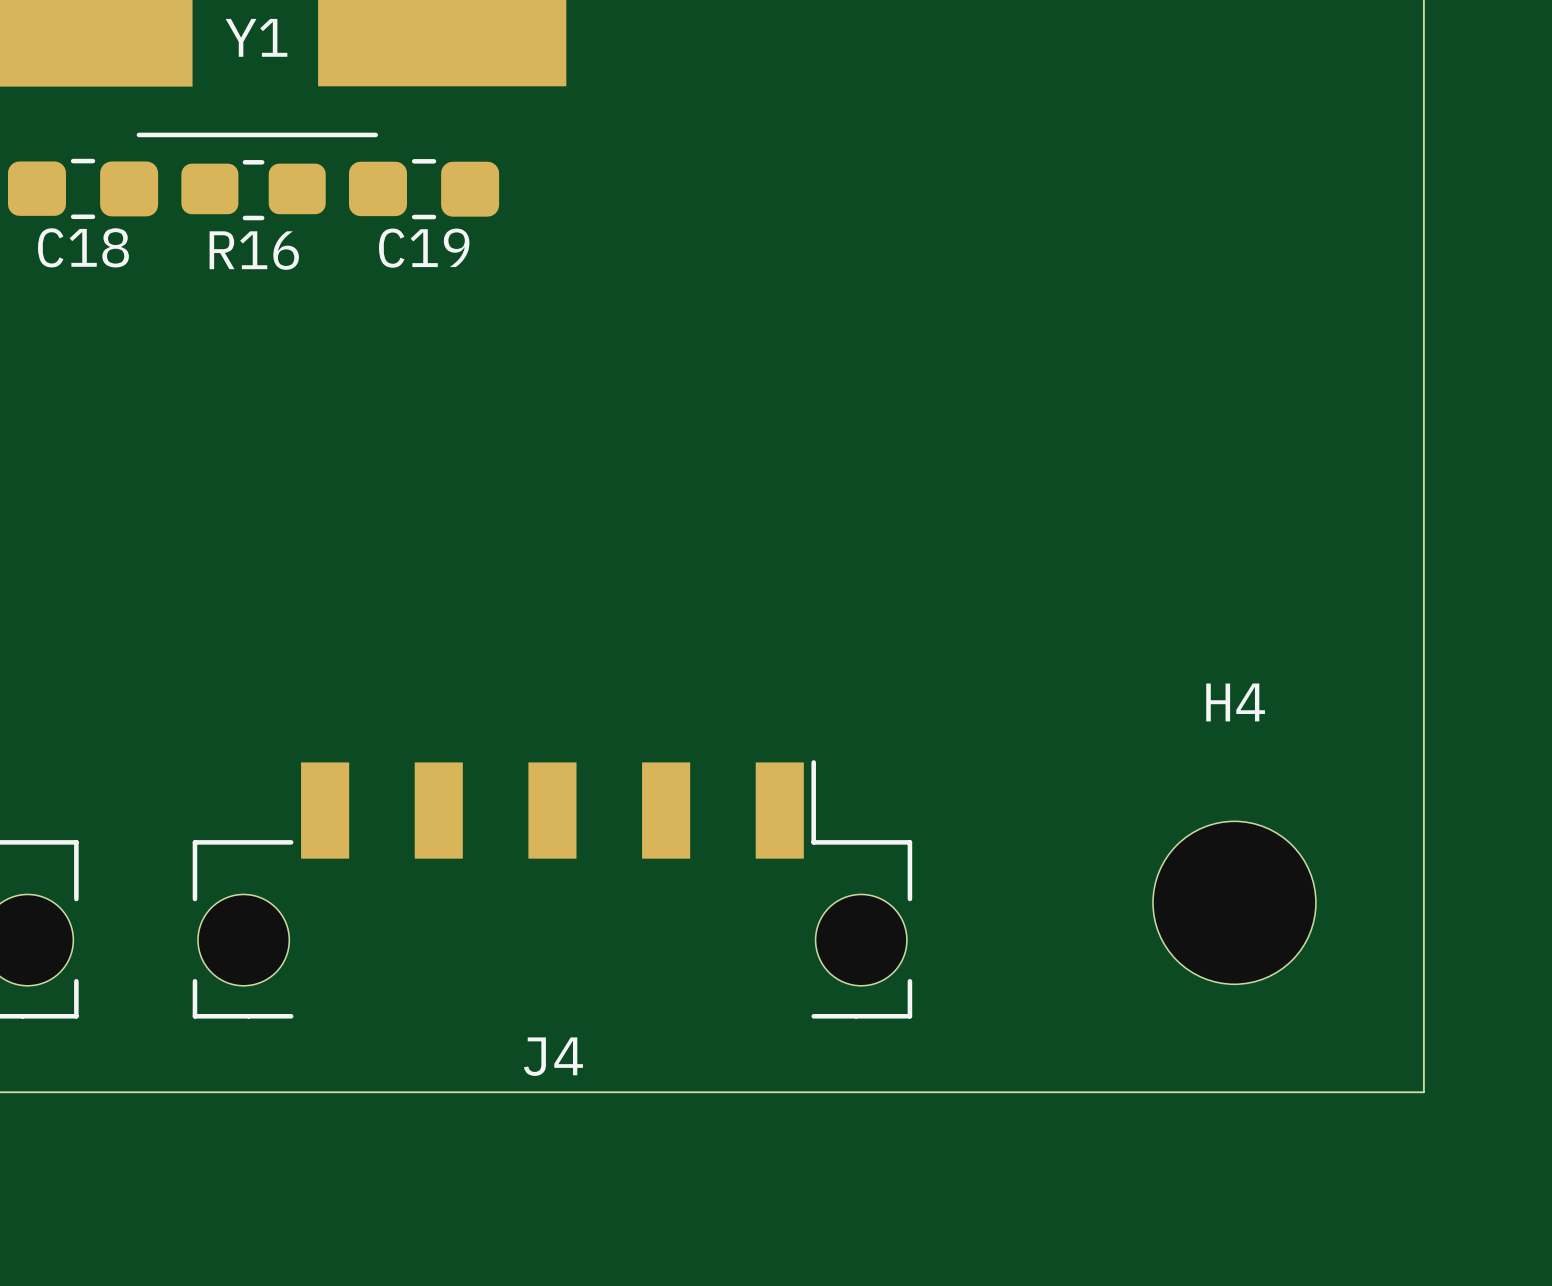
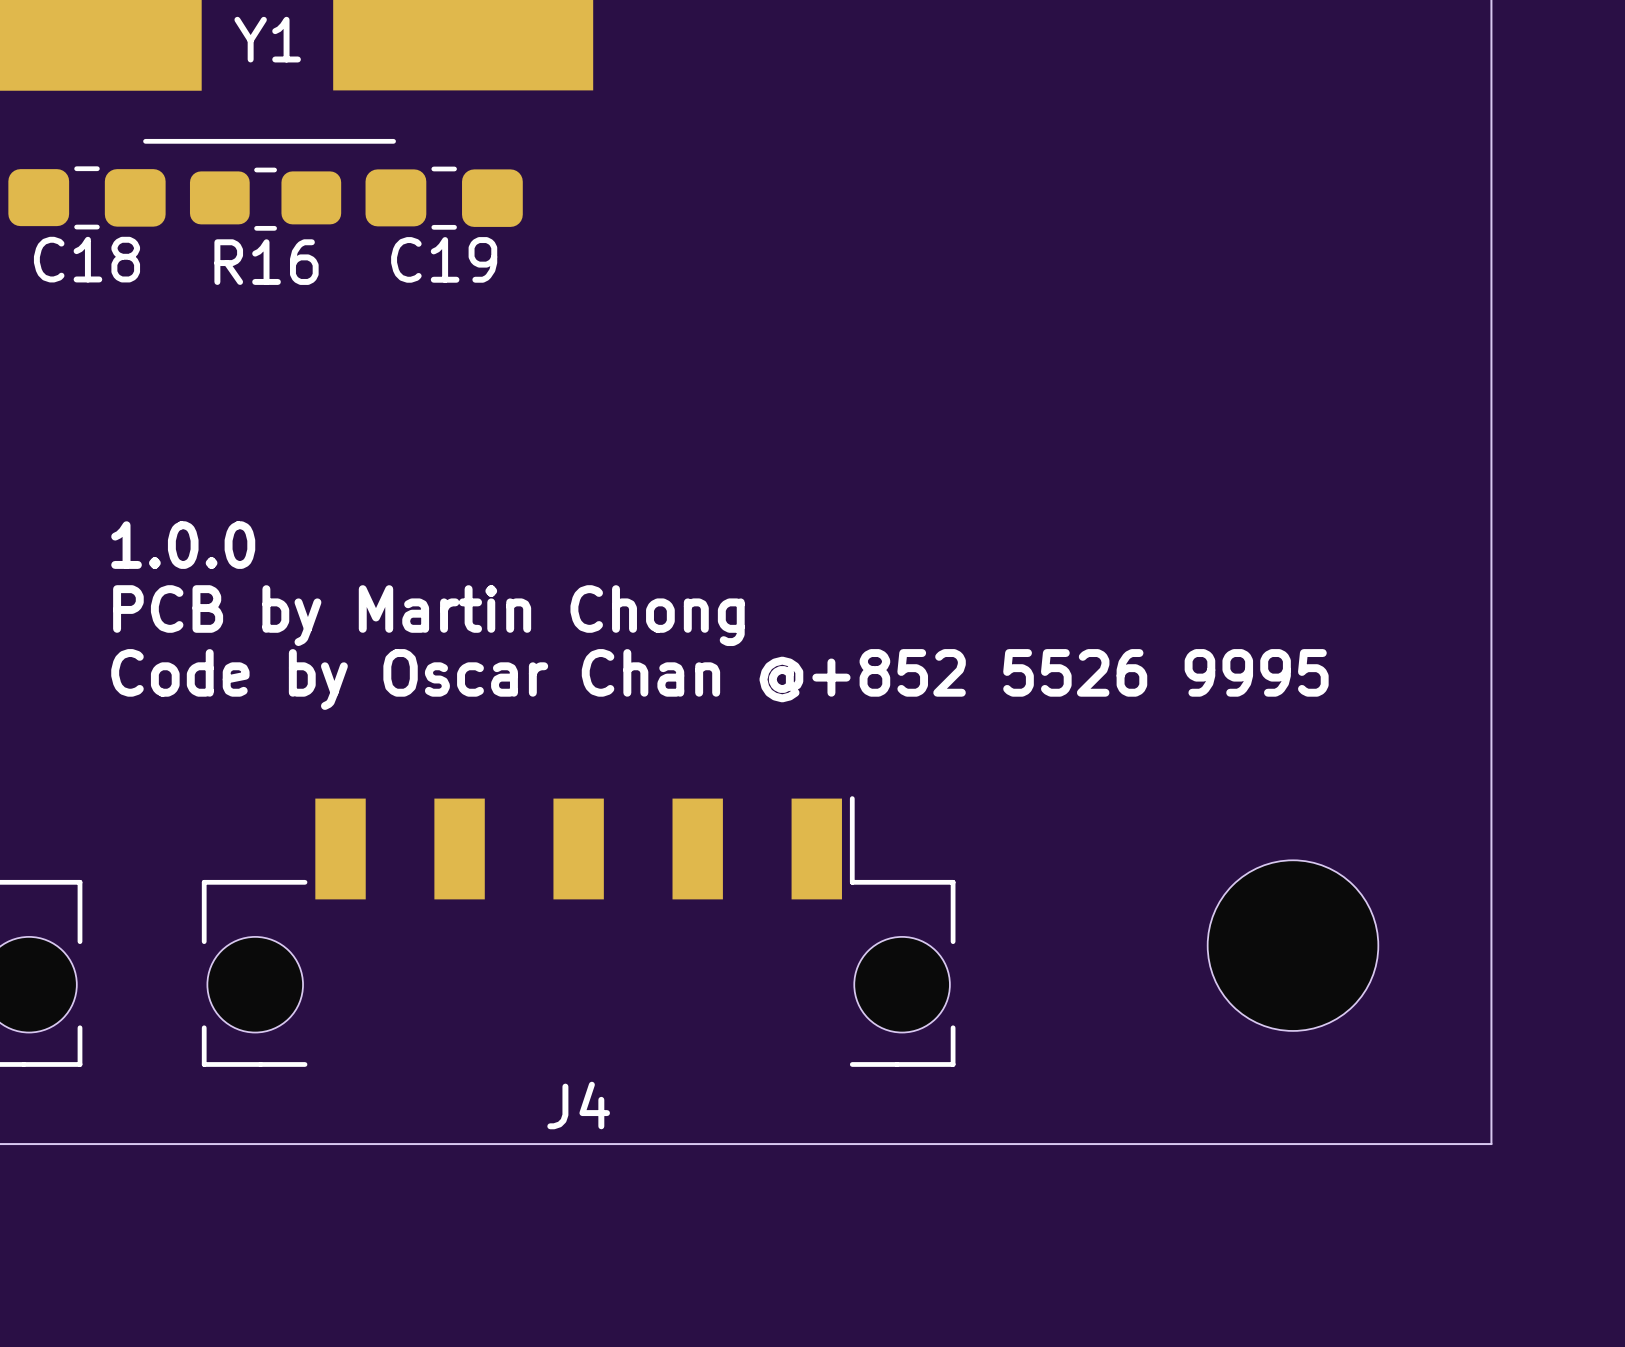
text: none -> 1.0.0 (183, 545)
text: none -> PCB by Martin Chong (428, 615)
text: none -> Code by Oscar Chan @+852 5526 9995 (719, 679)
H4 name: H4 (1235, 702) -> none

